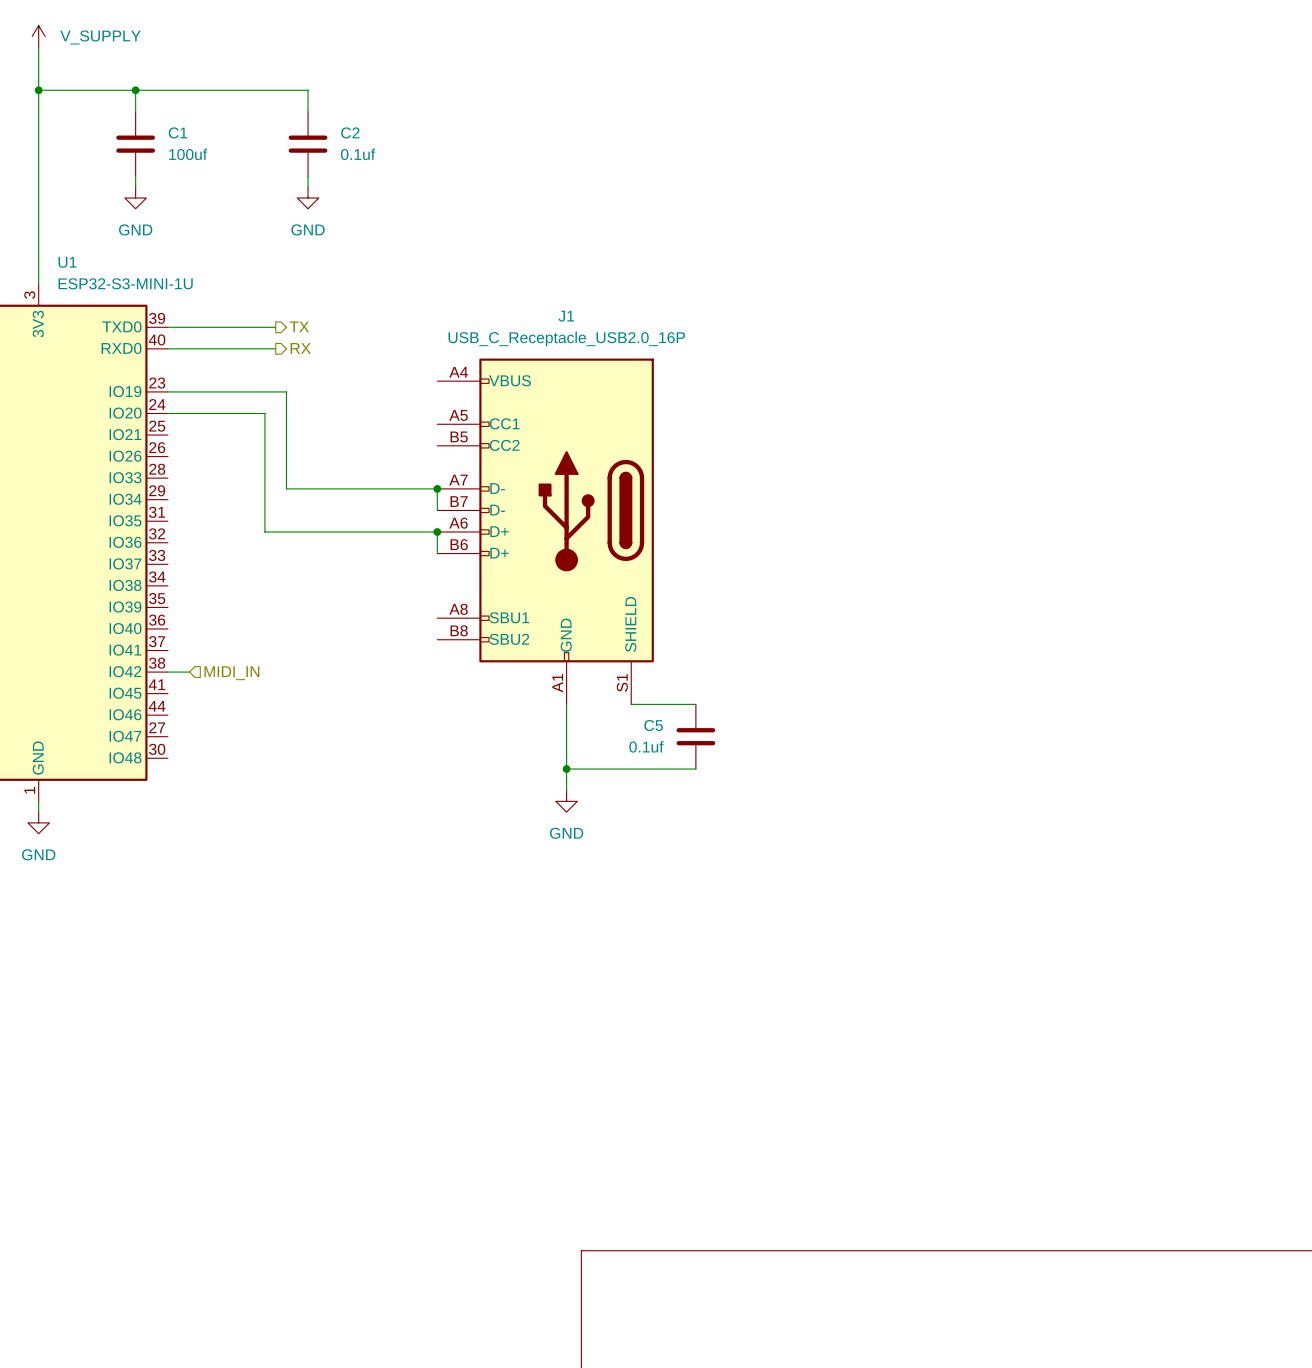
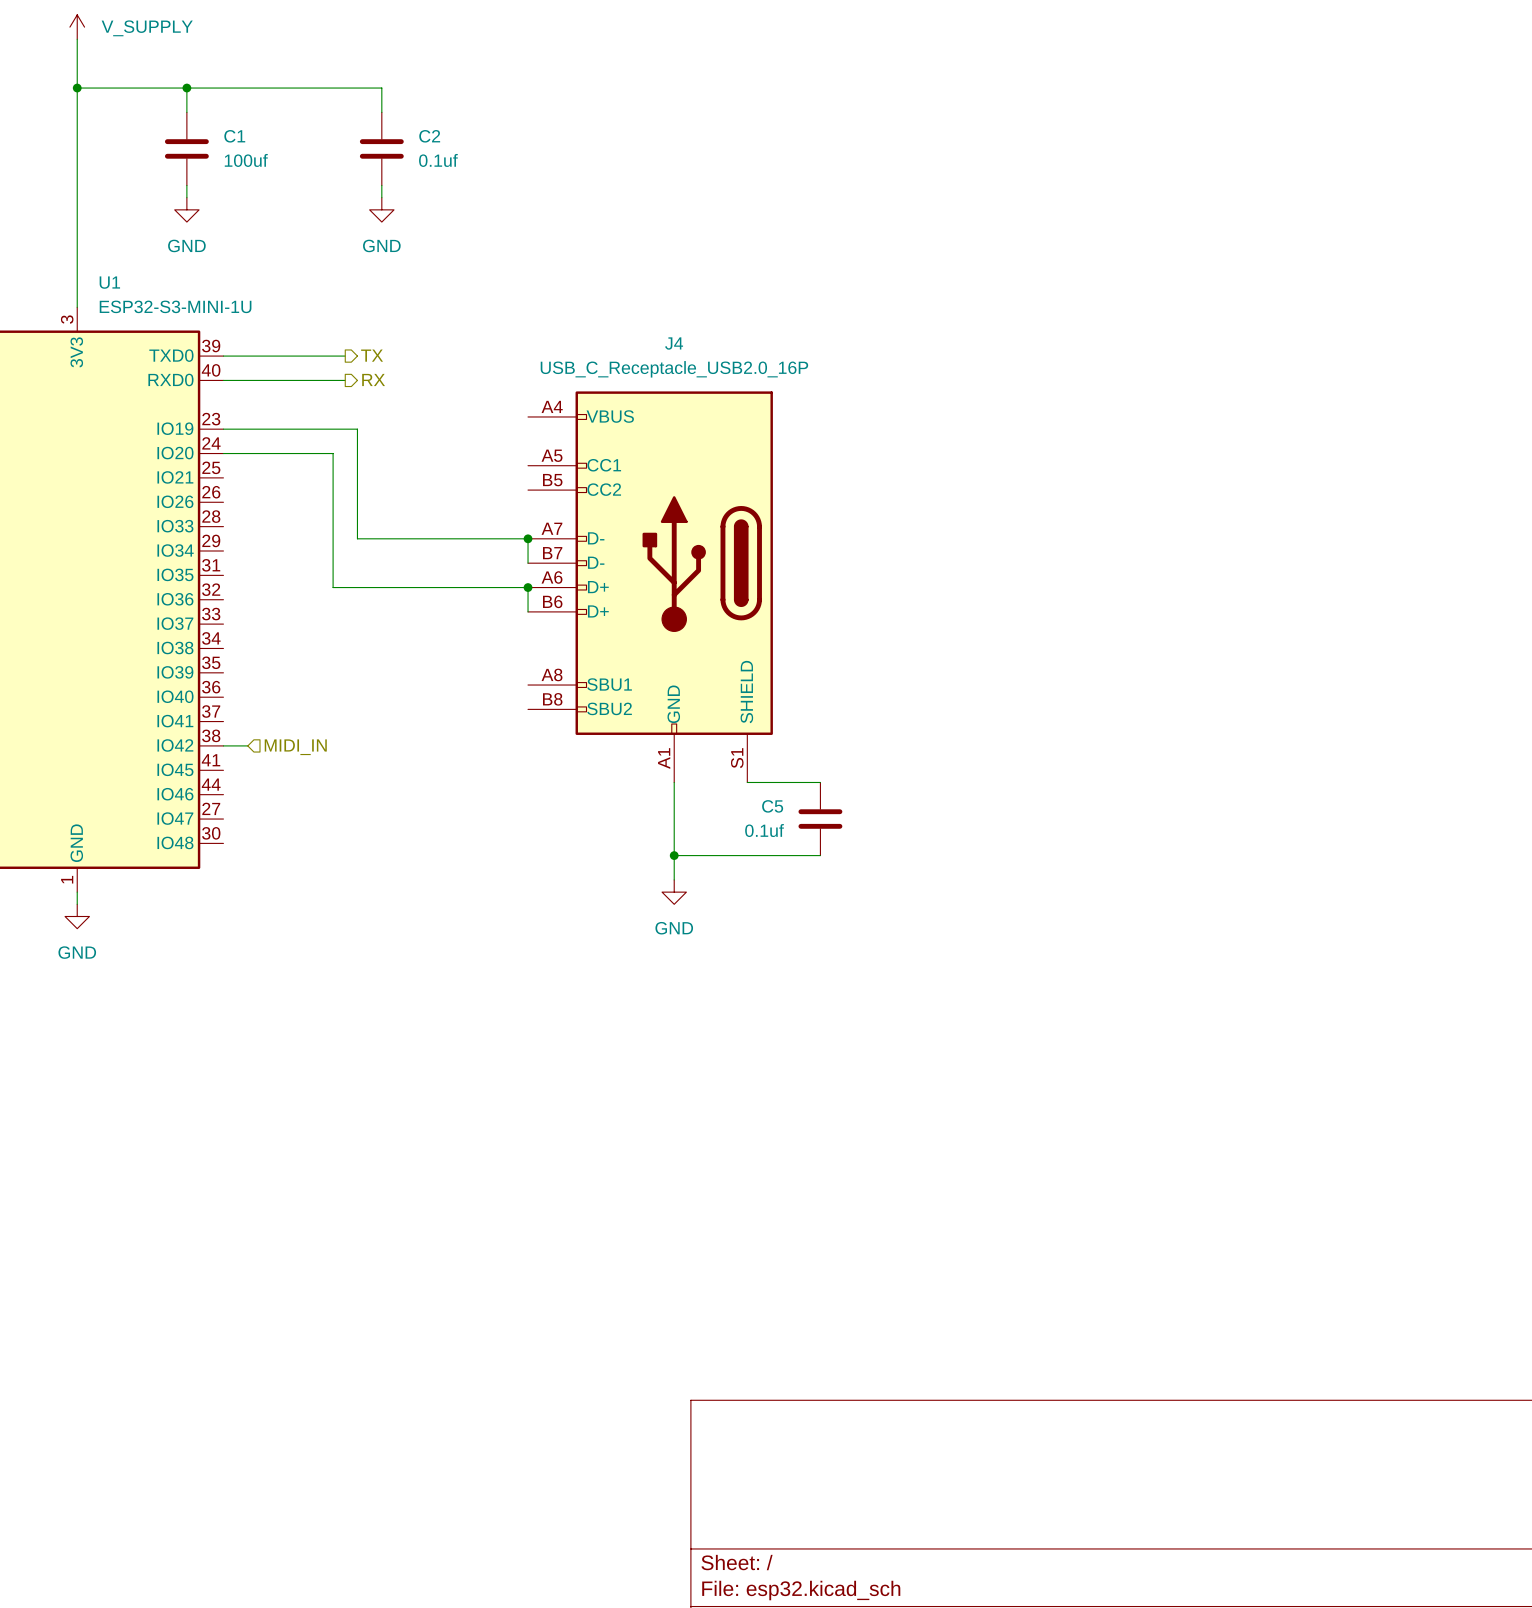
J1 name: J1 (566, 316) -> J4 (674, 343)

